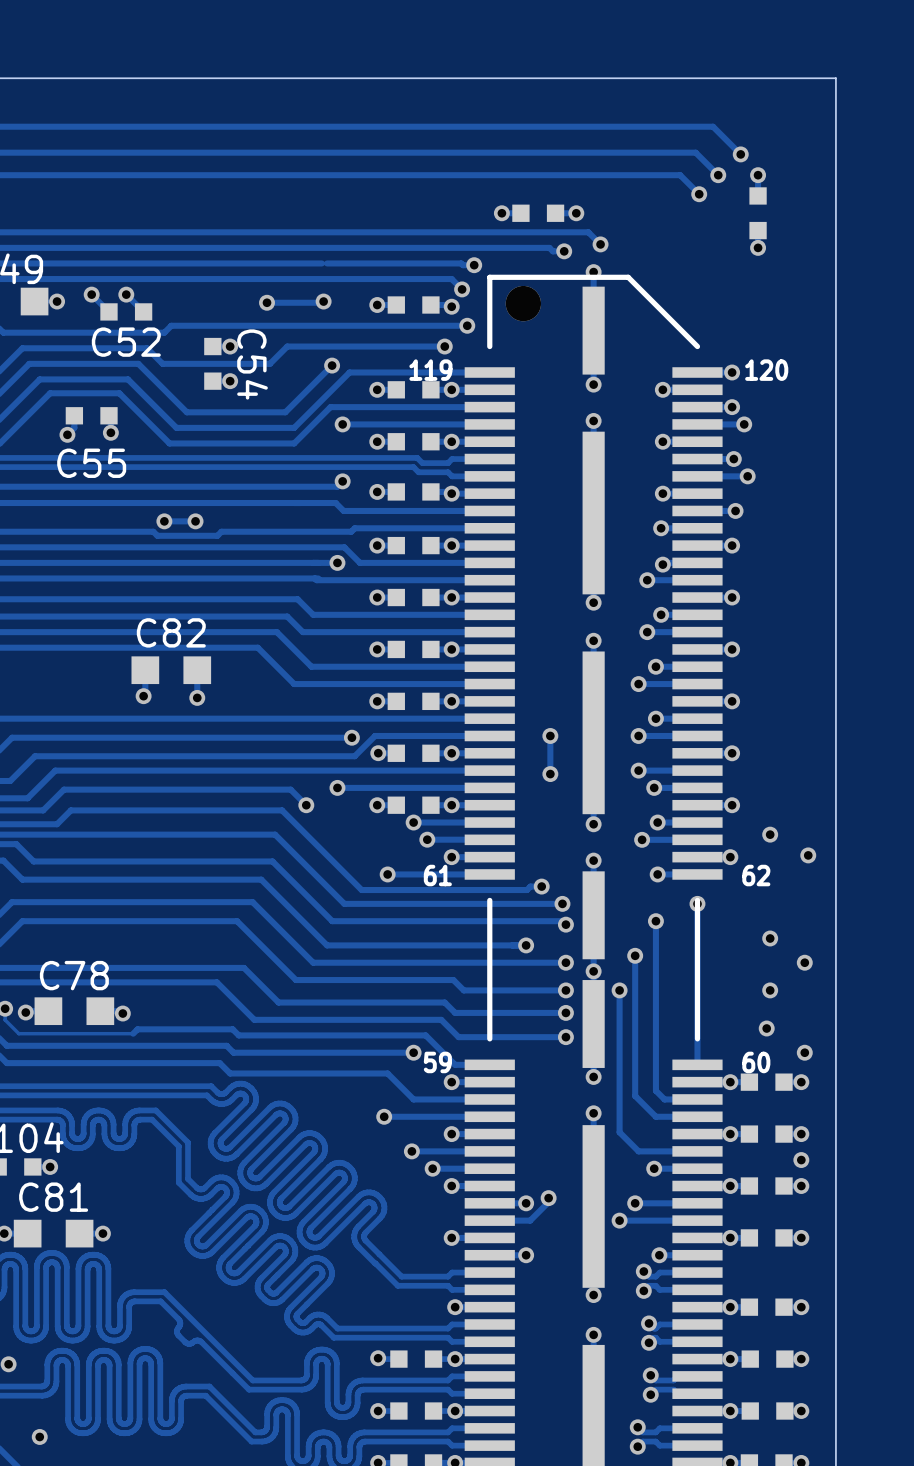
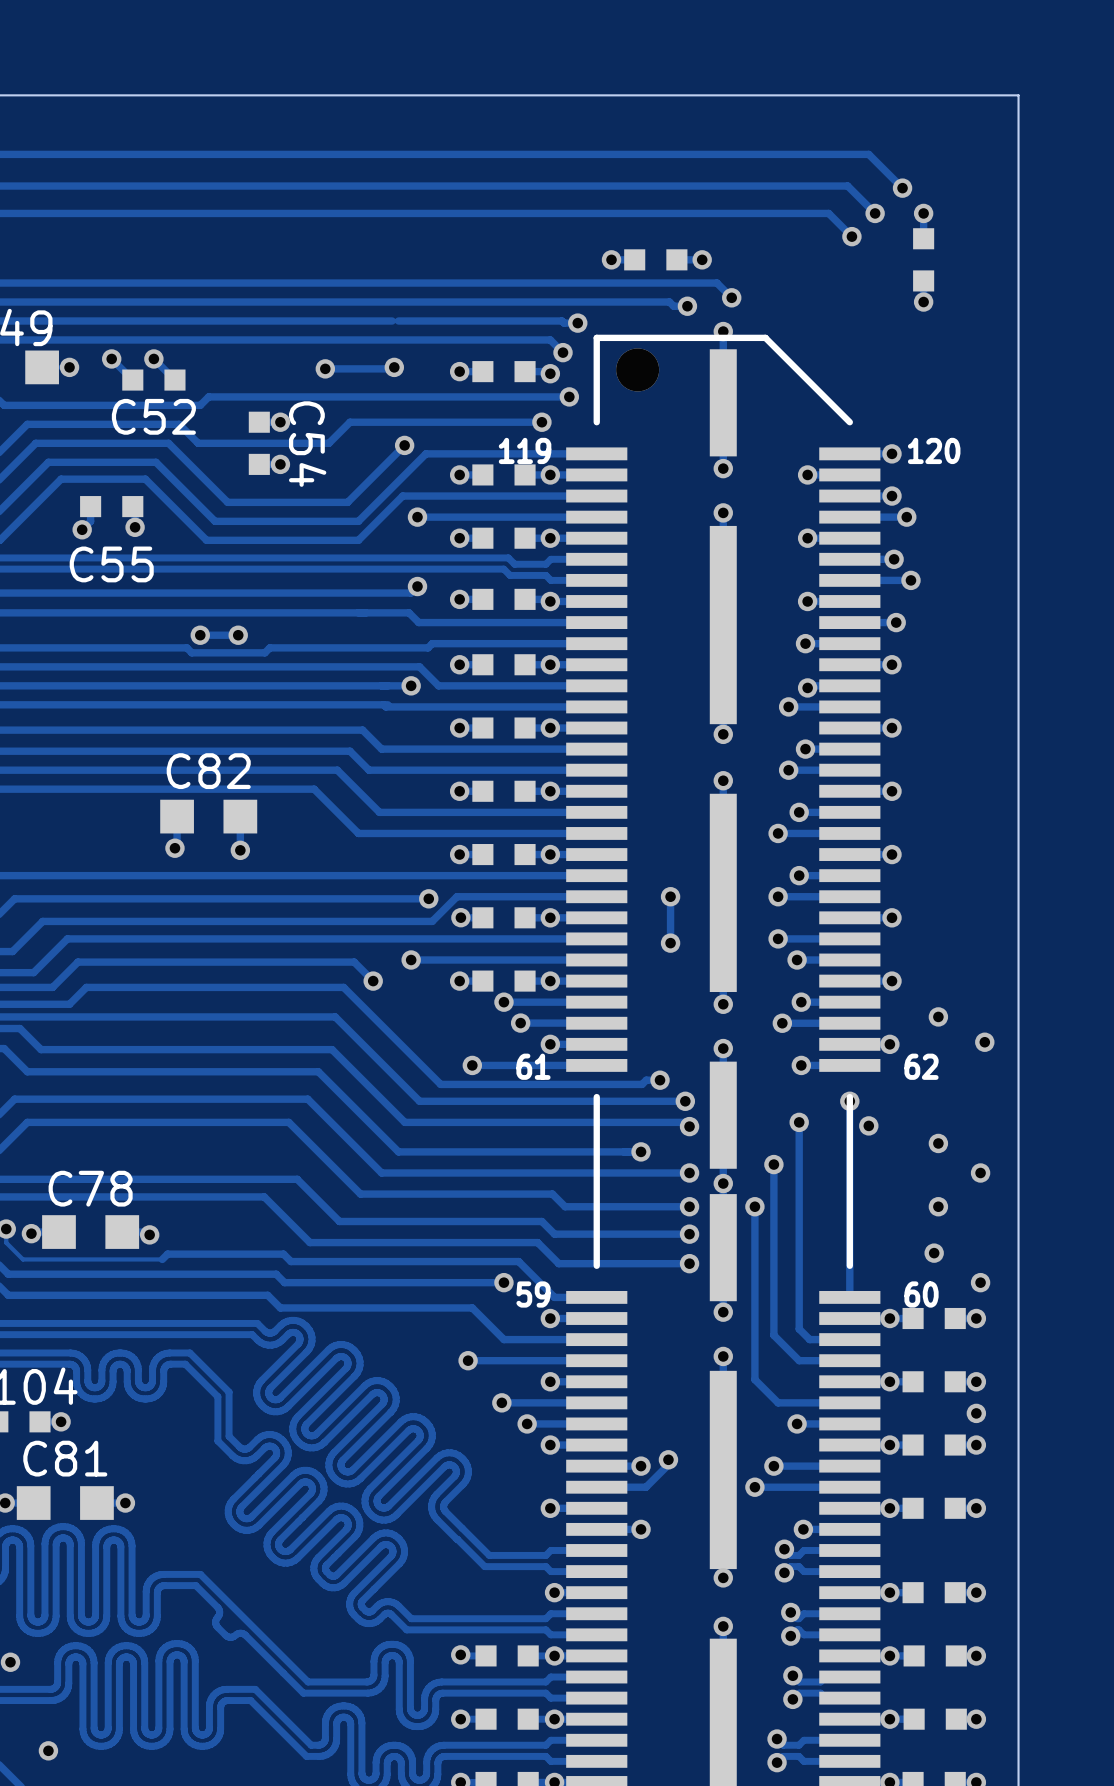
via: none -> (868, 1125)

